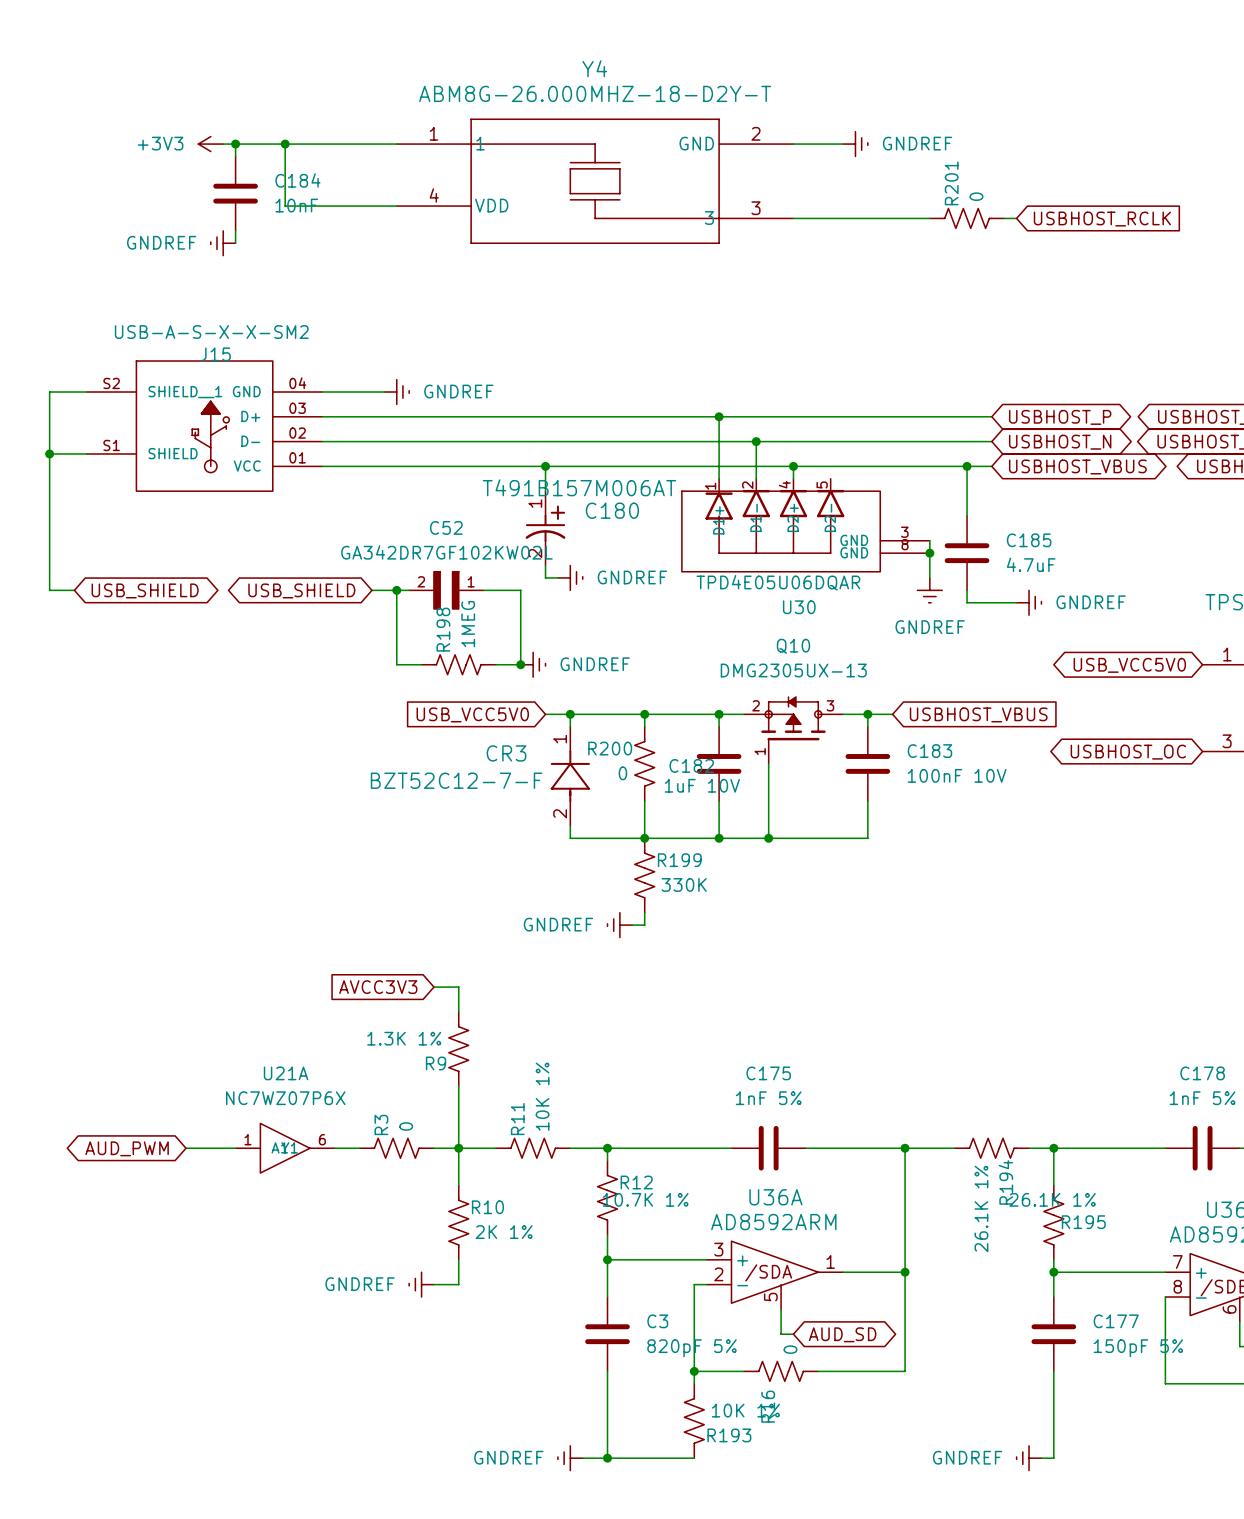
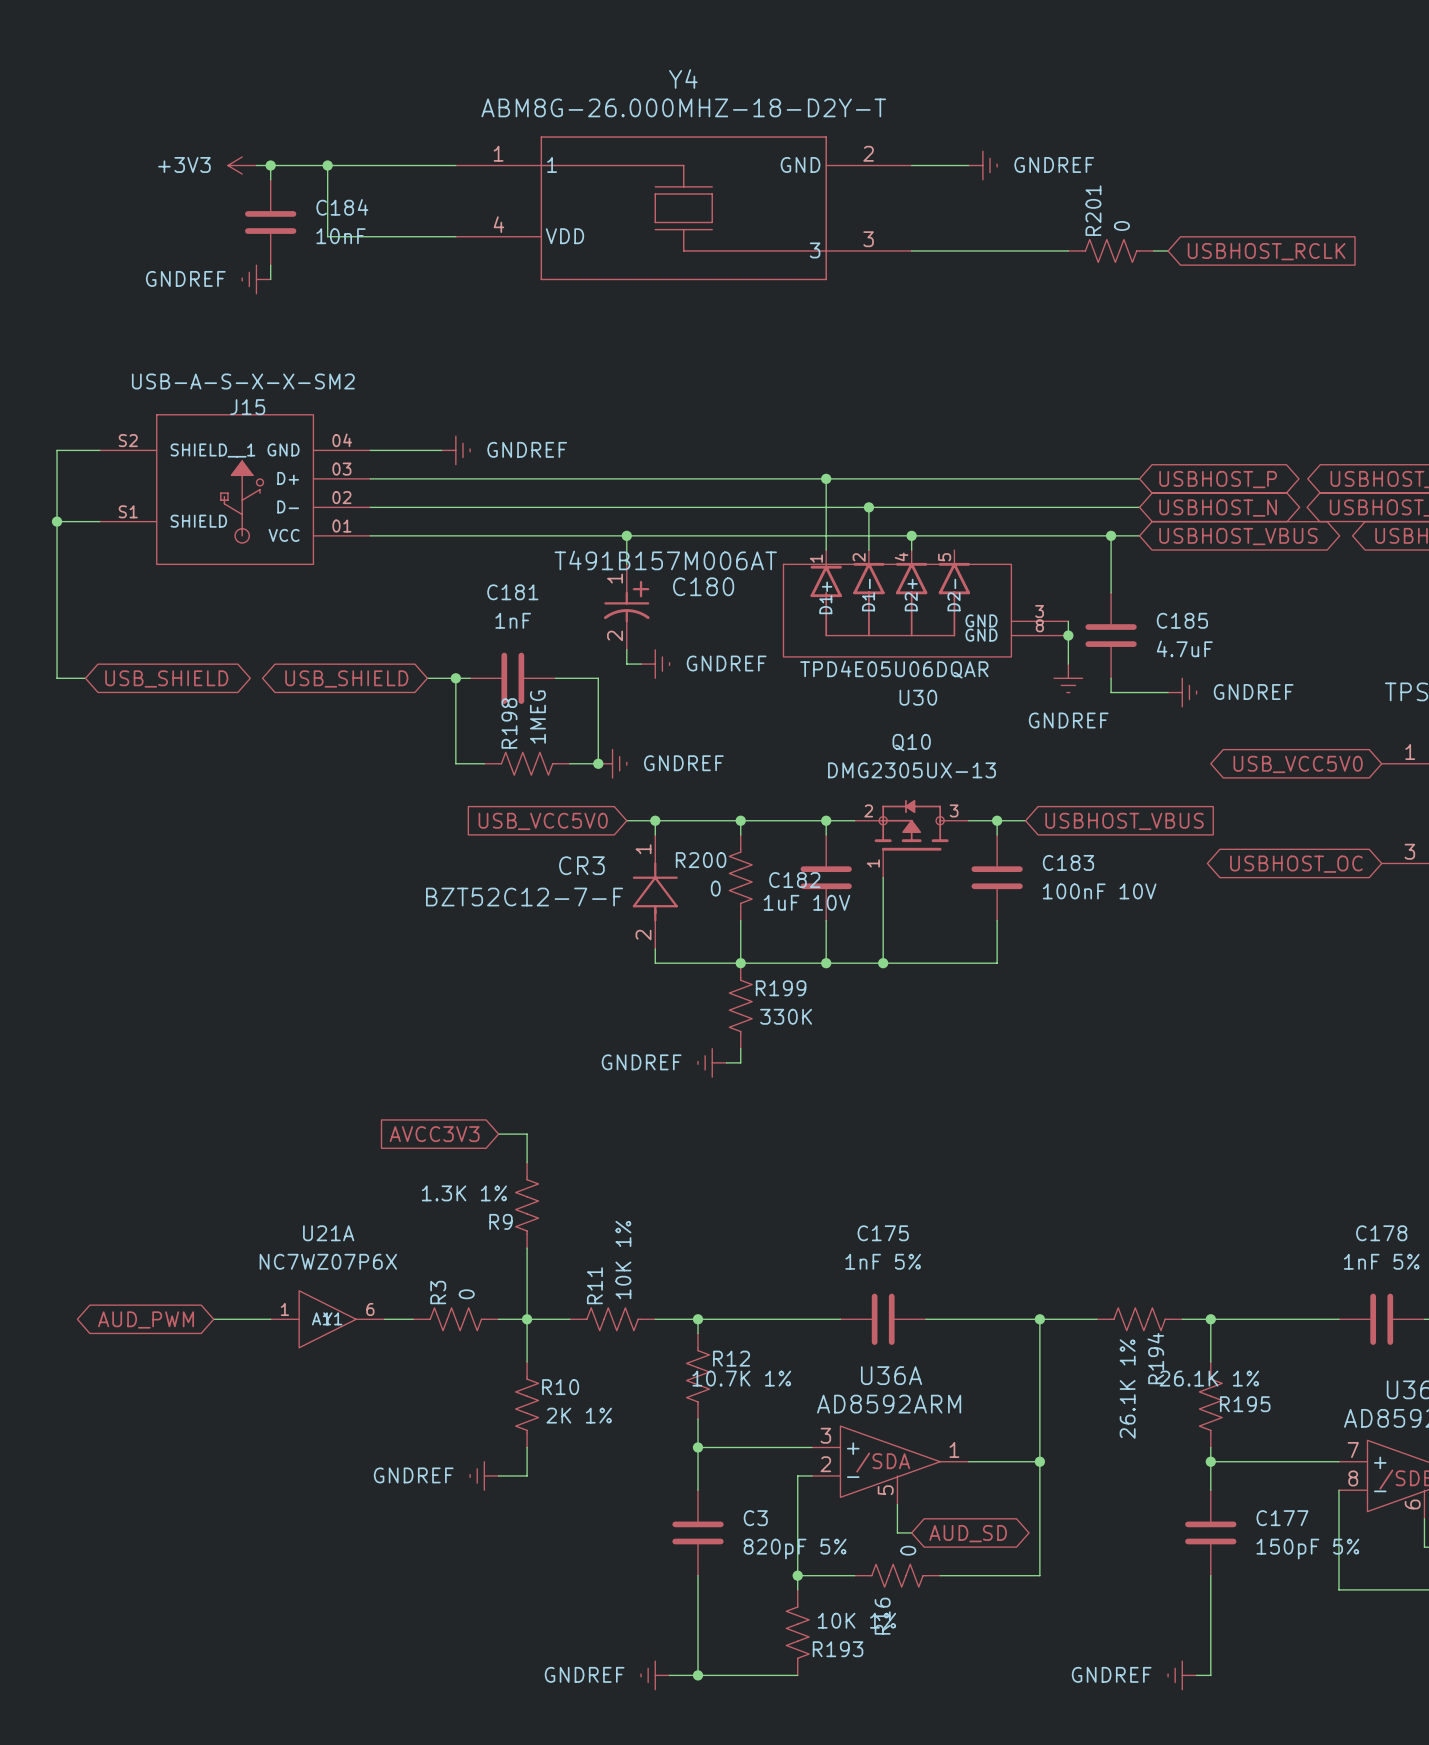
C52: GA342DR7GF102KW02L (446, 590) -> none
C181: none -> 1nF (512, 678)

